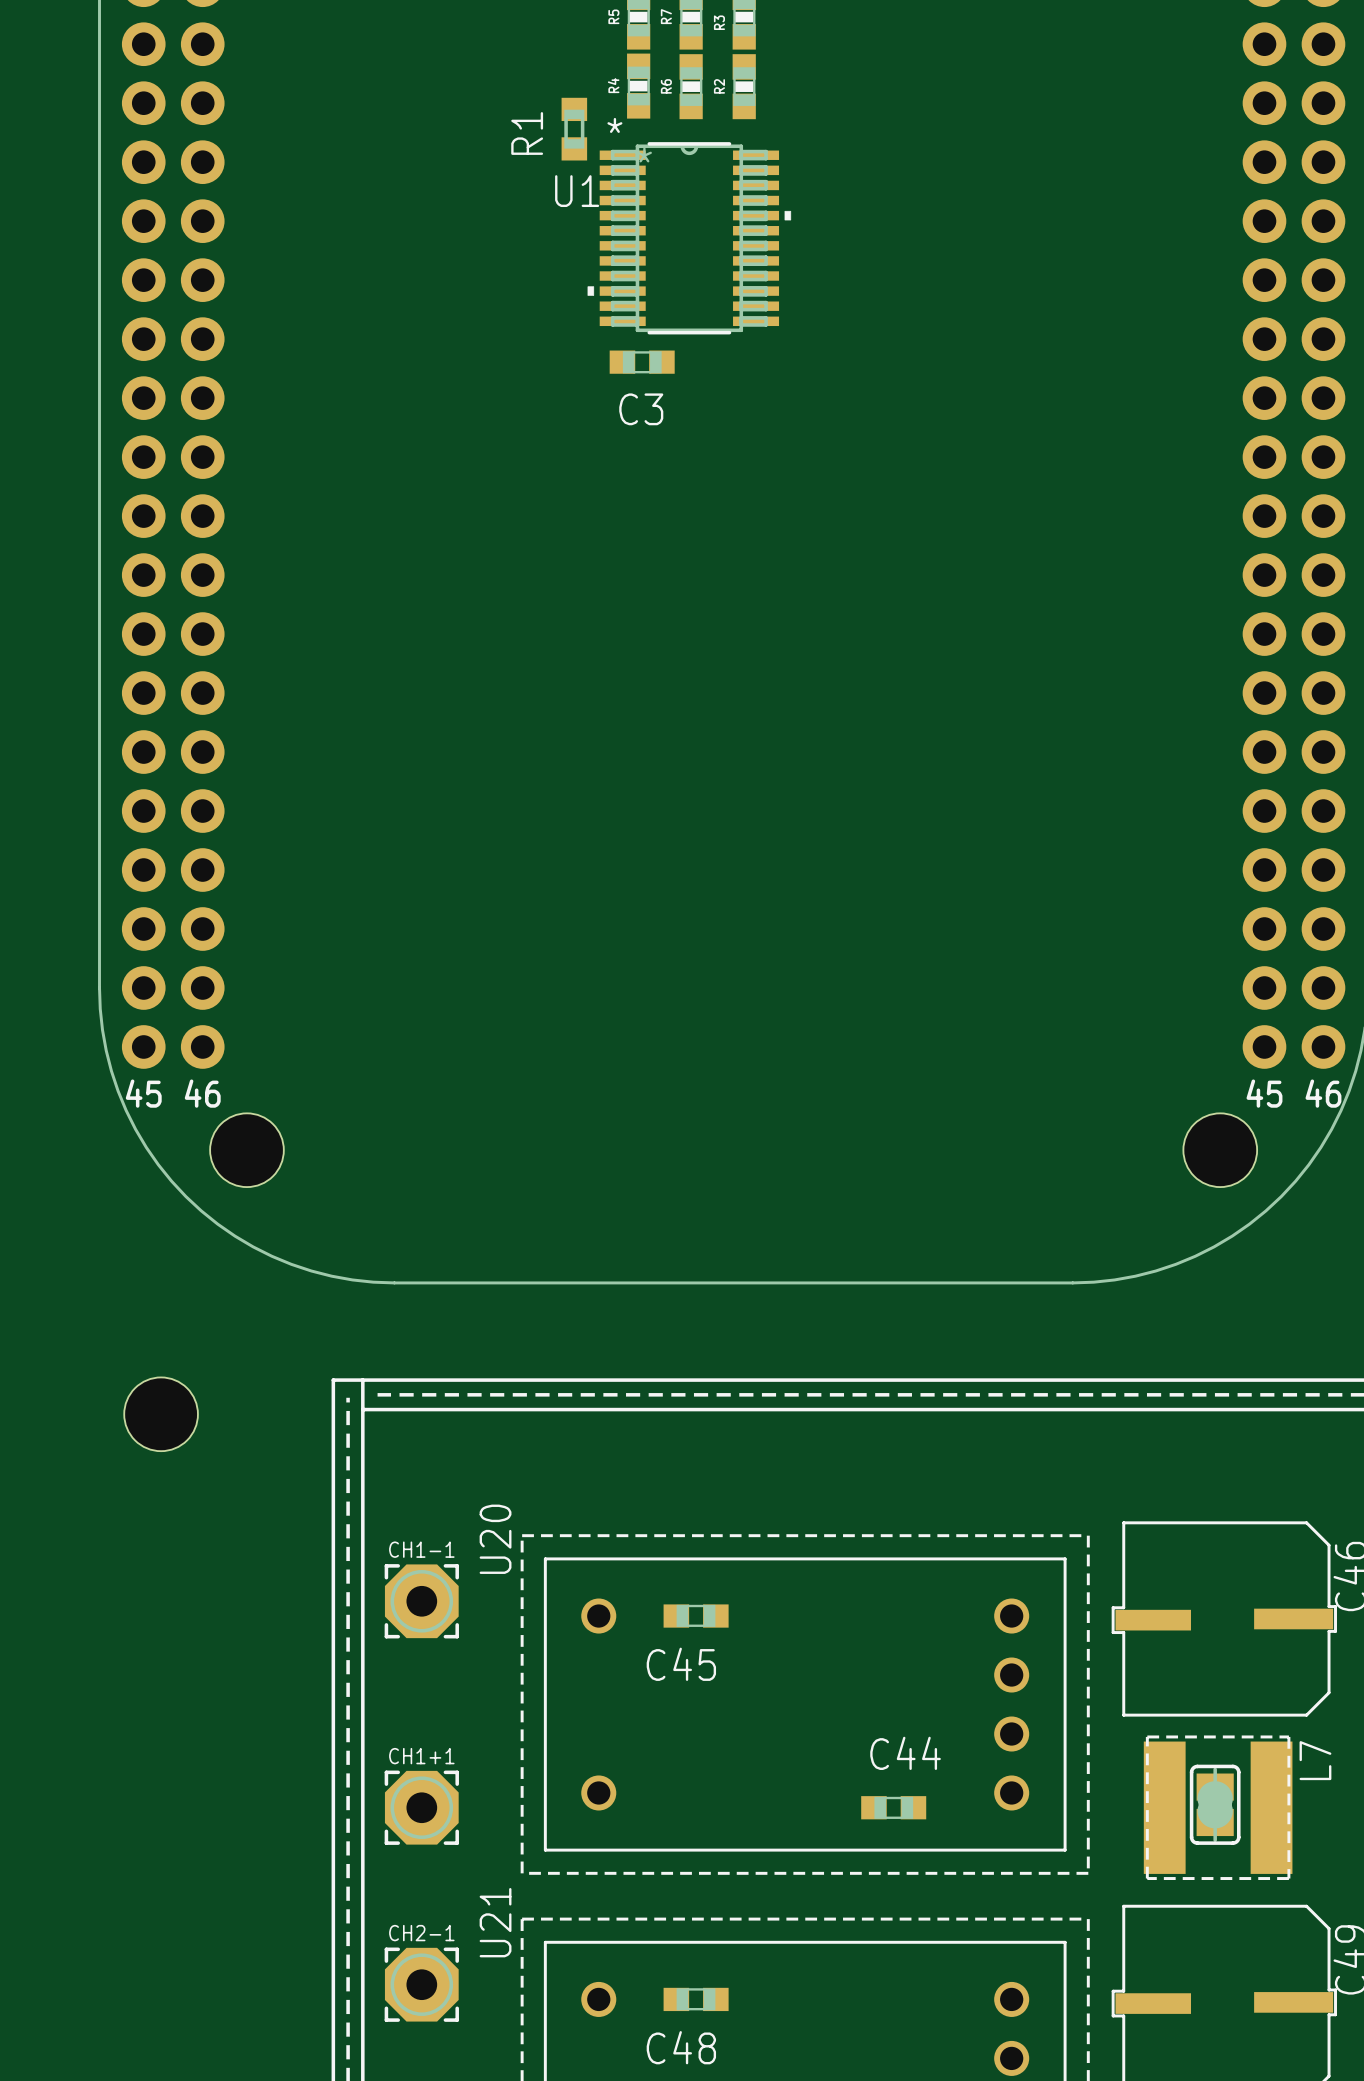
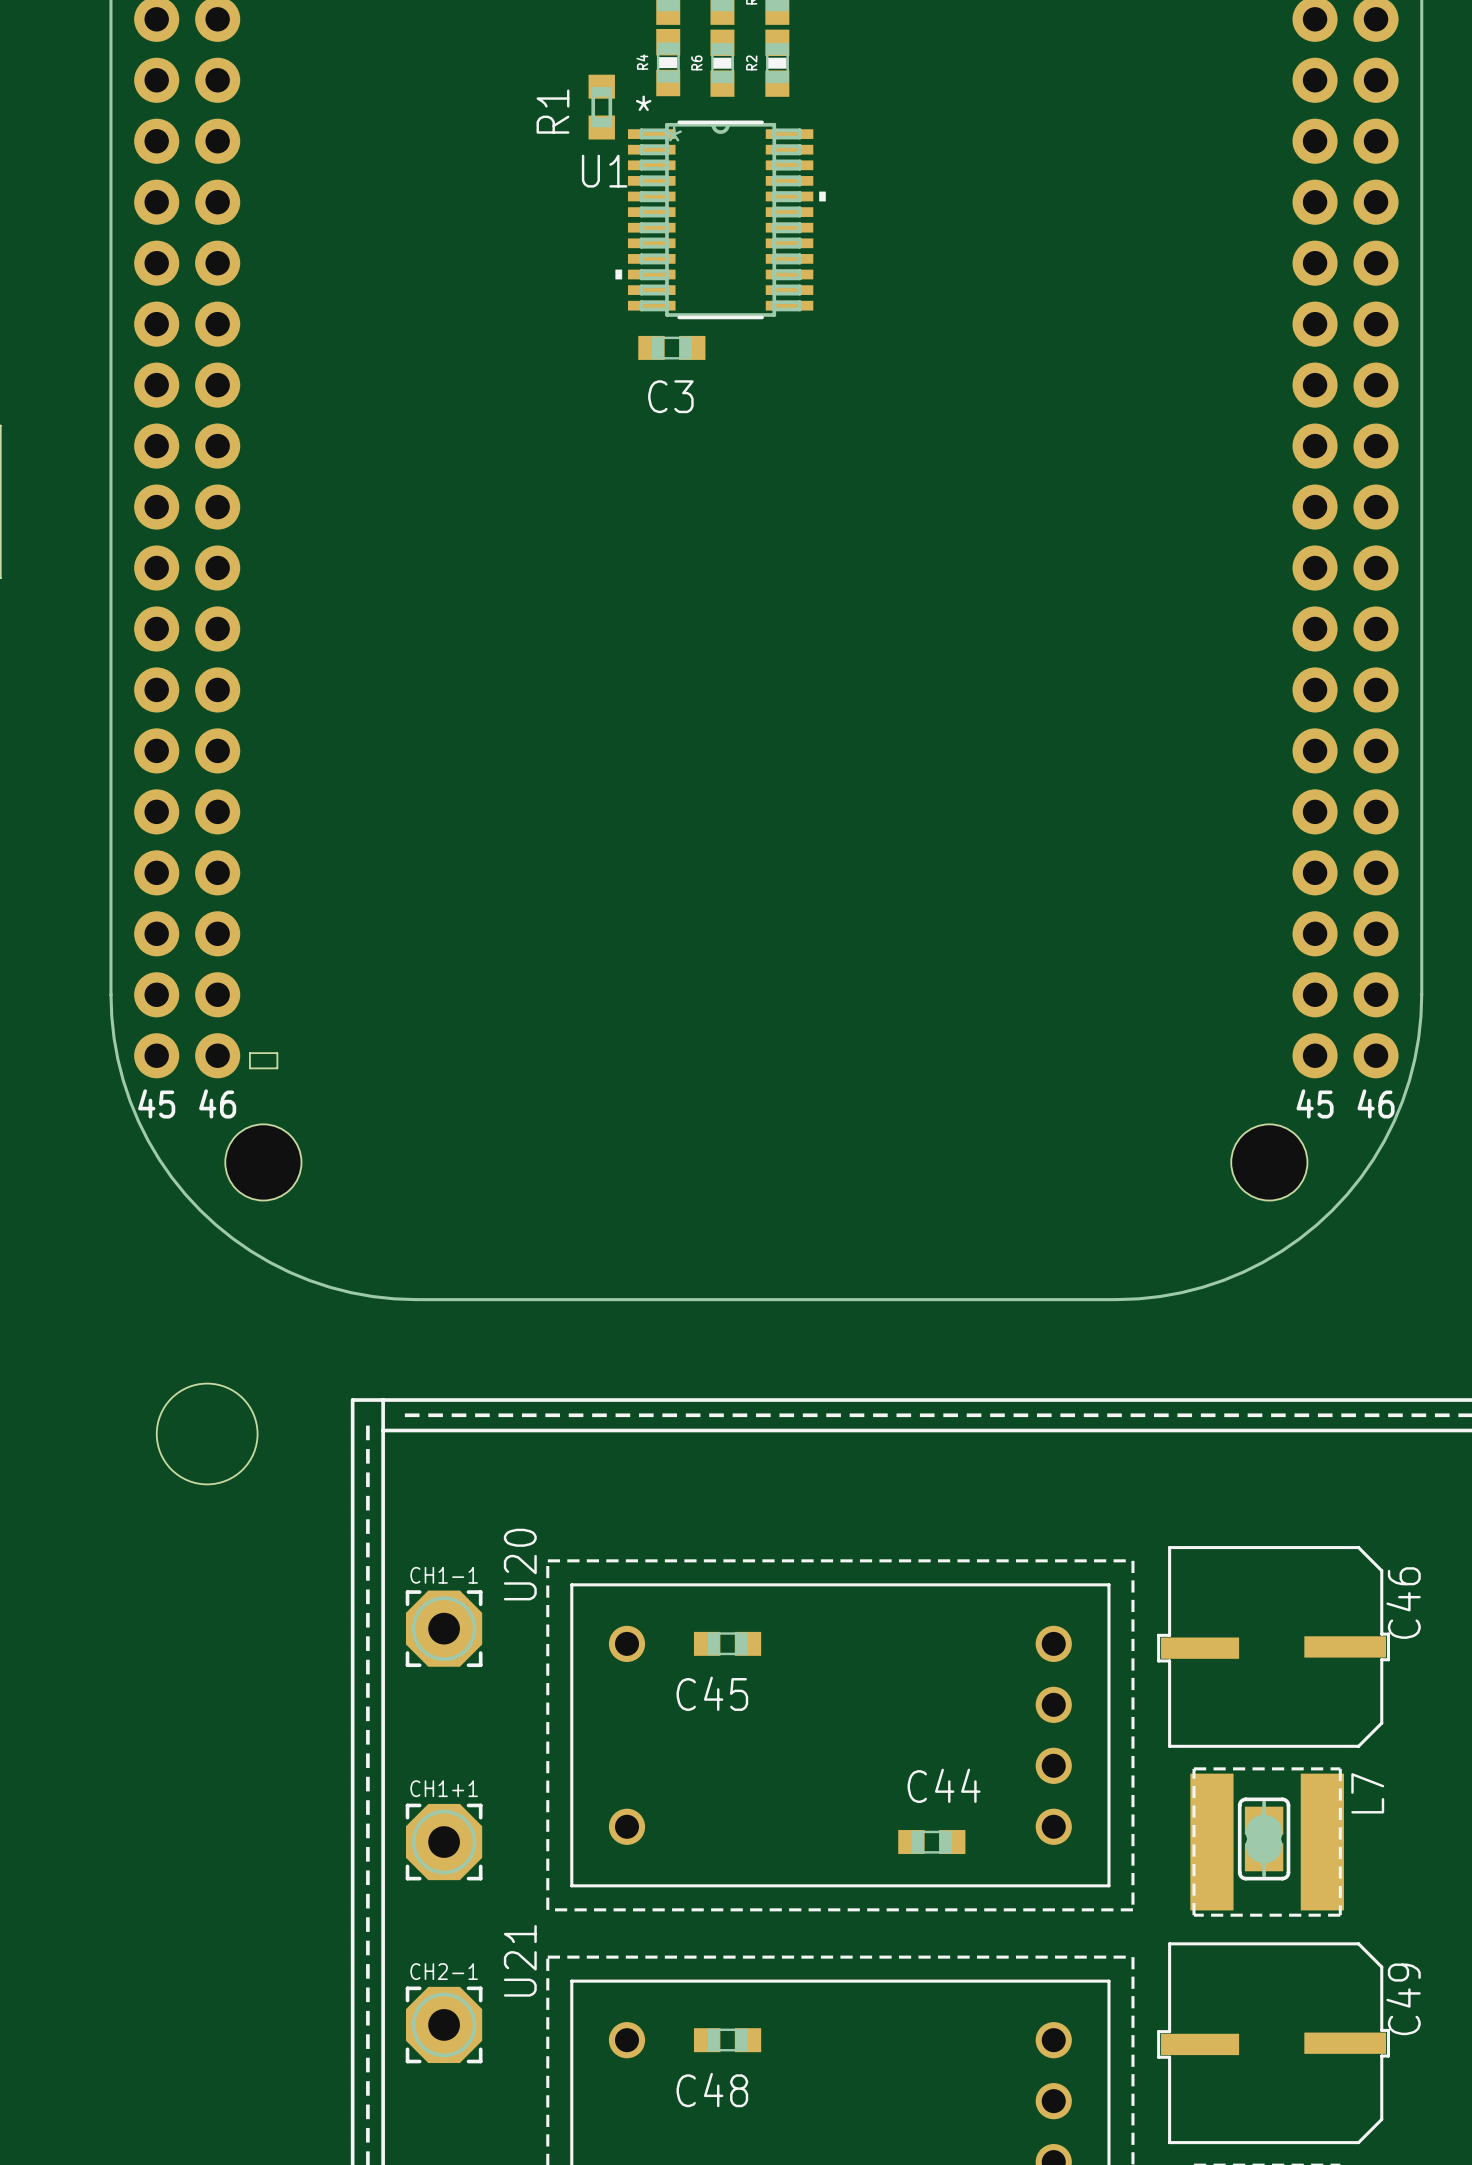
board edge: none -> (249, 1053) (277, 1053) (277, 1068) (249, 1068) (249, 1053)
round board edge: none -> [156, 1383, 258, 1485]
hole: (161, 1414) -> none

